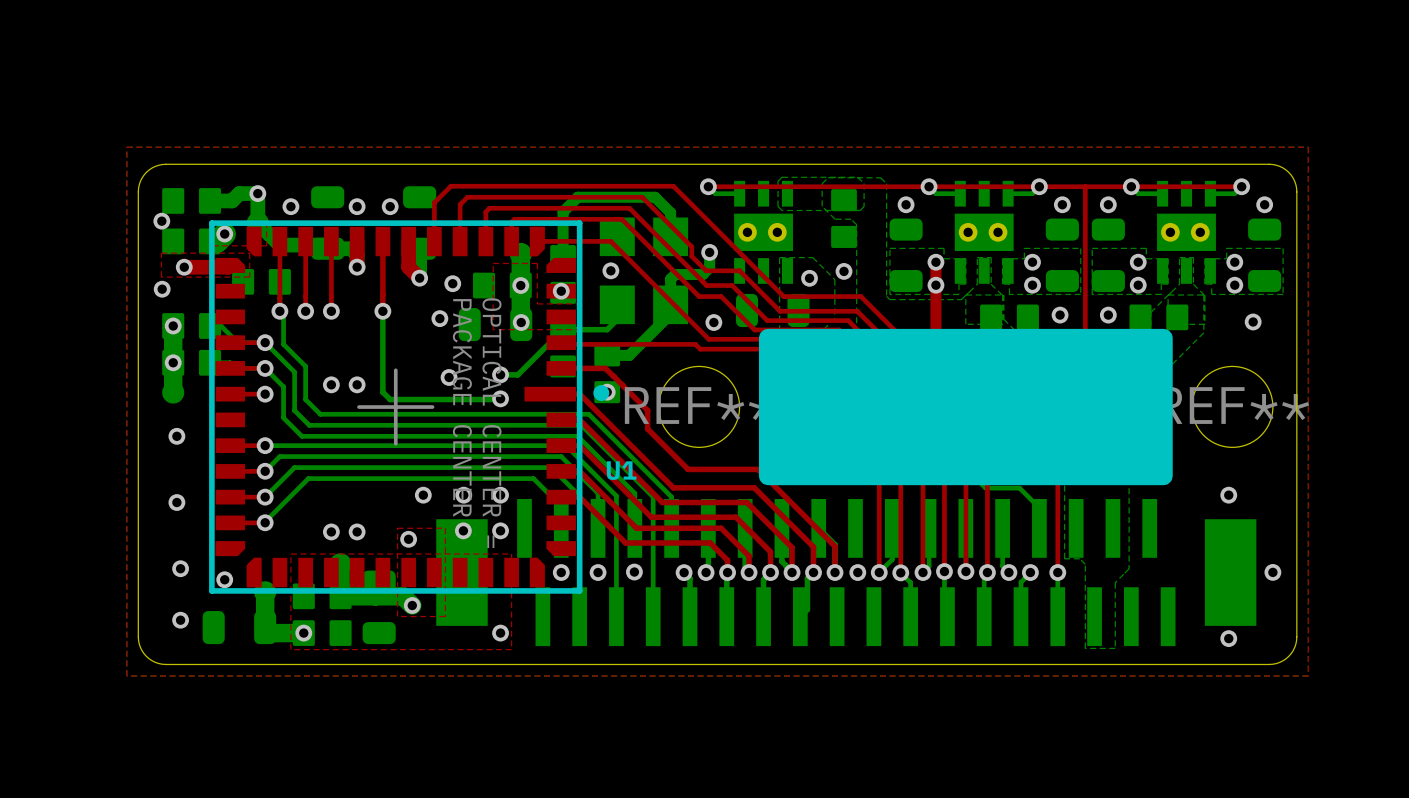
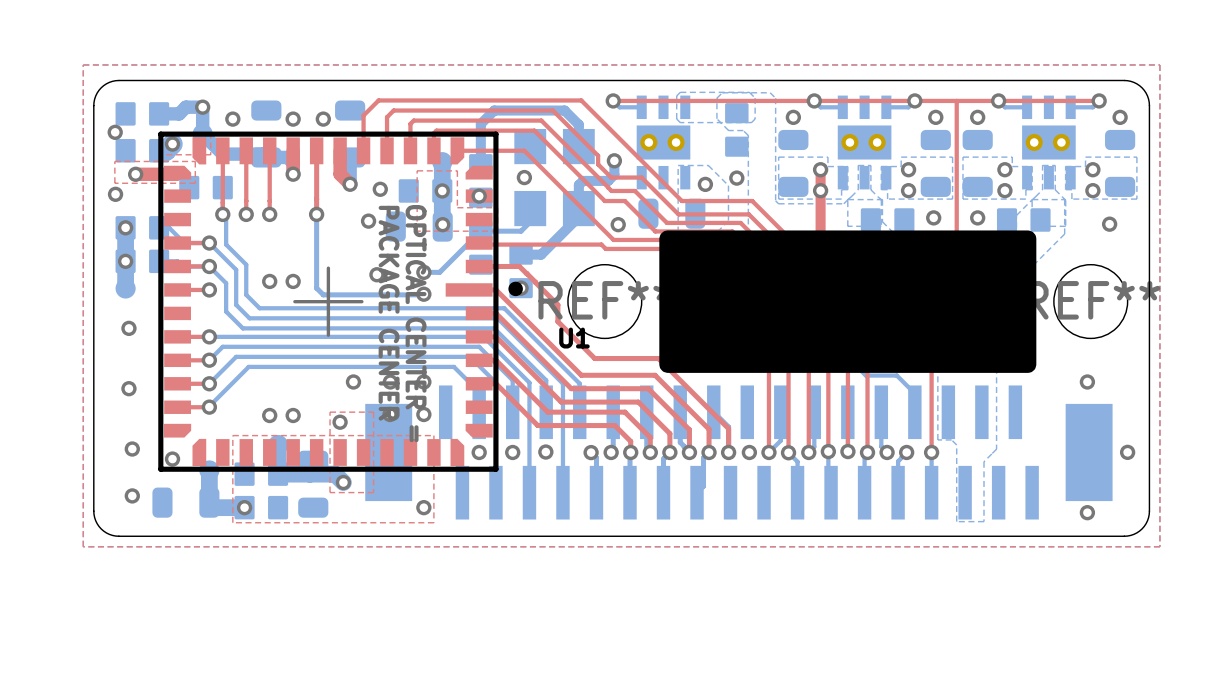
U1 name position: U1 (621, 470) -> U1 (574, 338)

